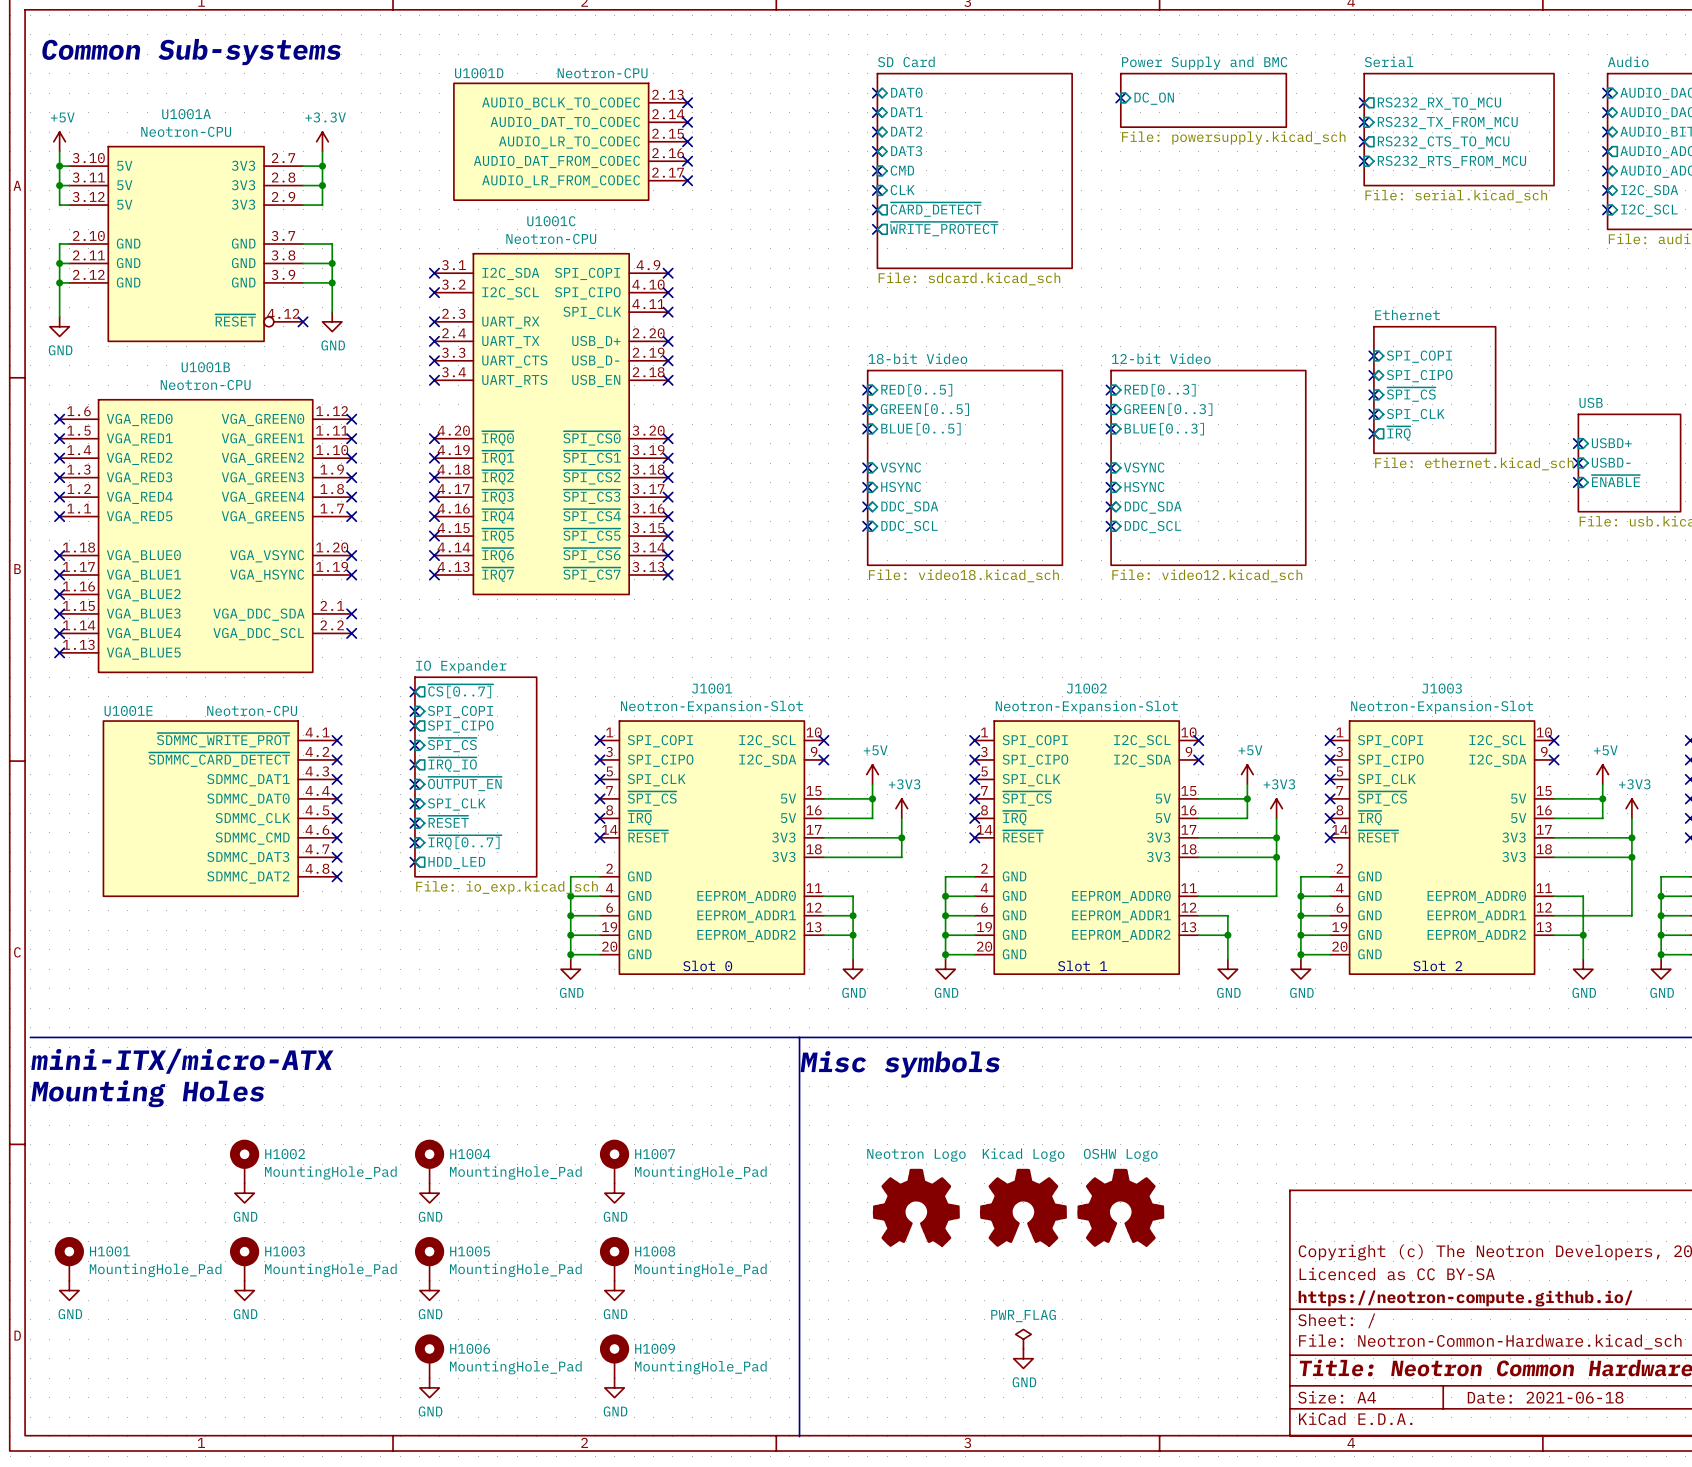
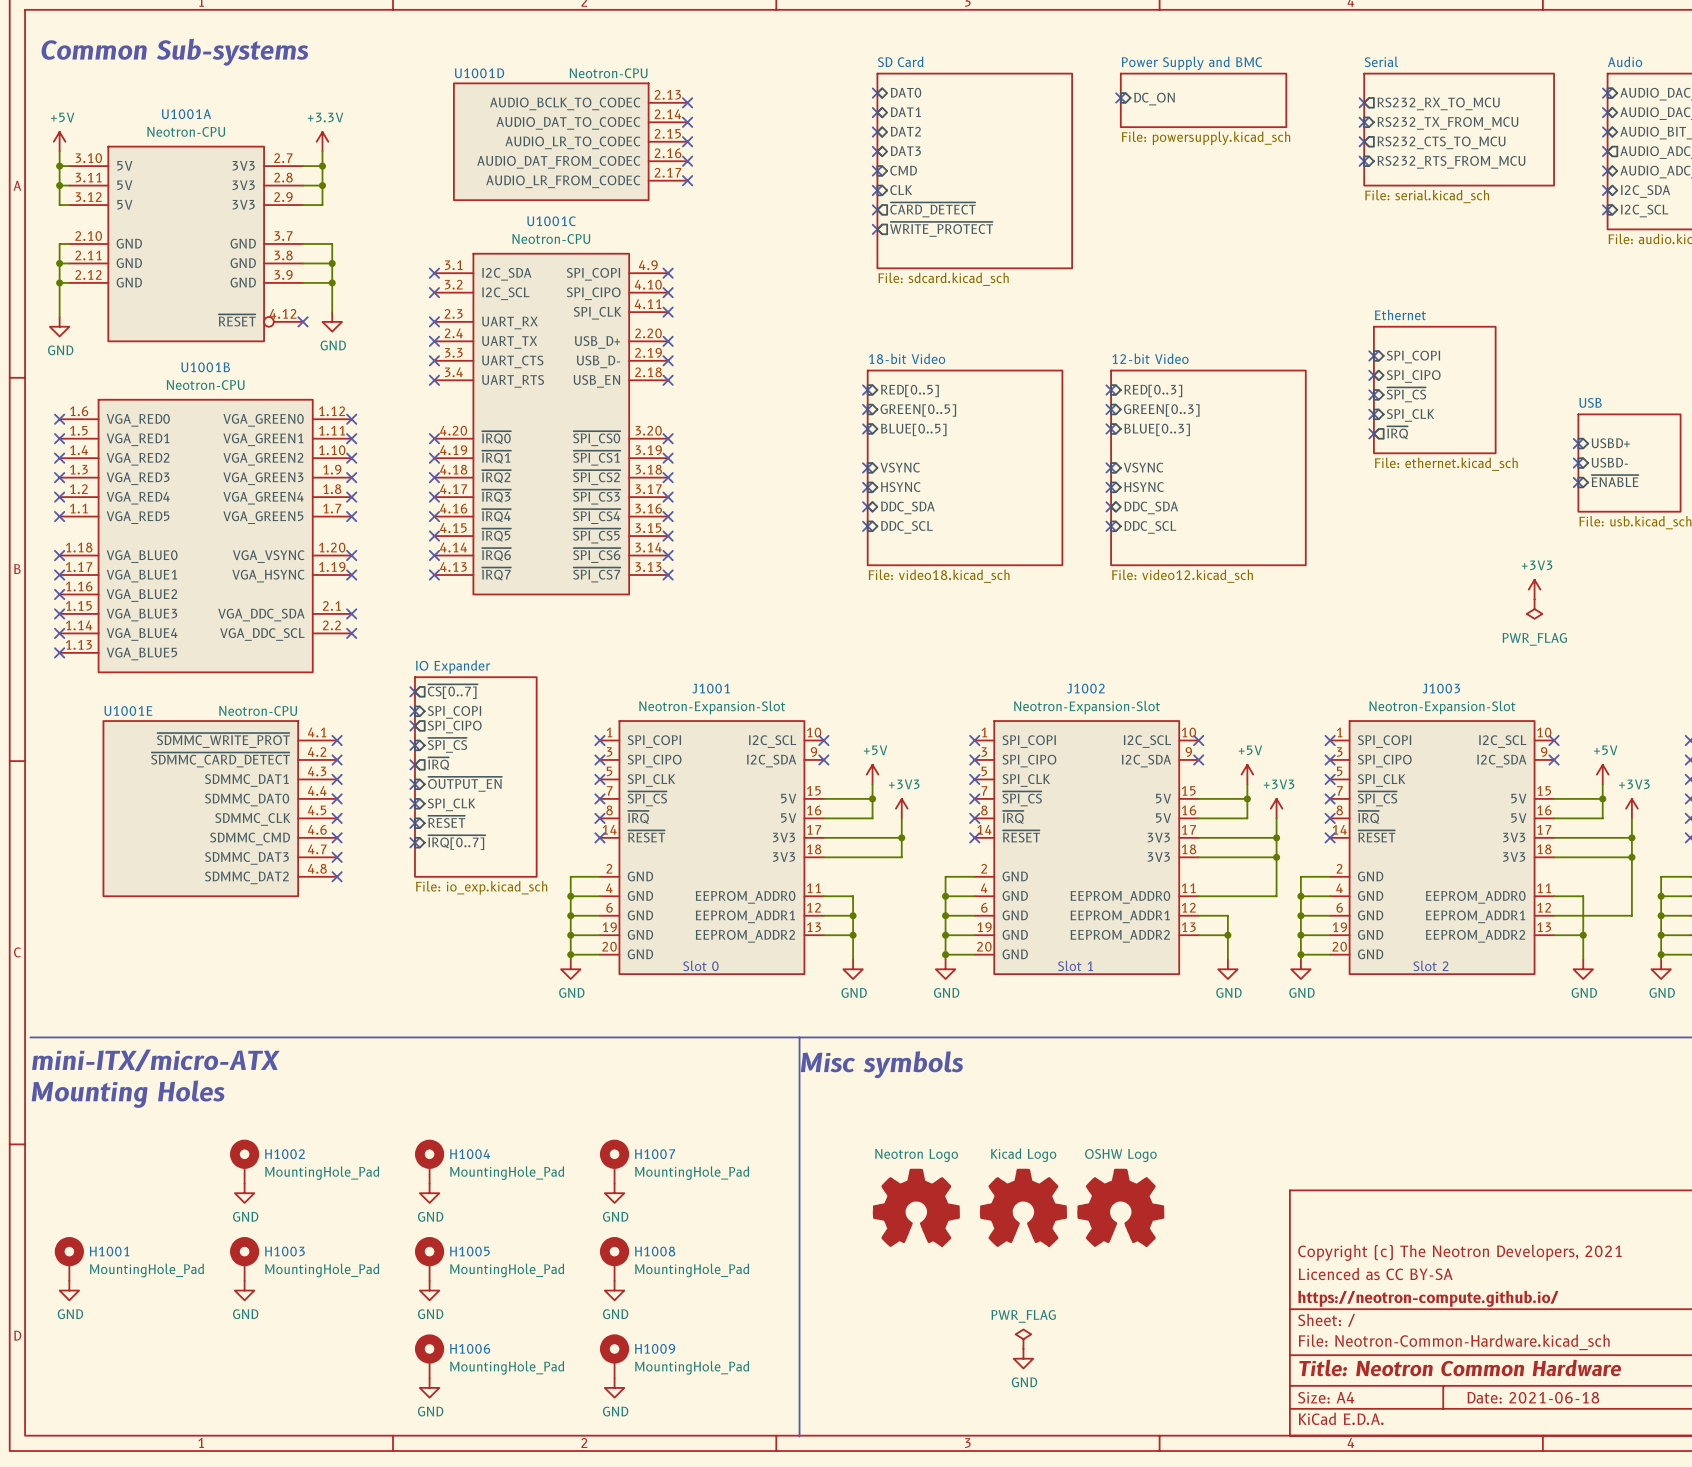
power symbol: none -> +3V3 (1534, 589)
power symbol: none -> PWR_FLAG (1534, 609)
sheet pin: ~{IRQ_IO} (452, 764) -> ~{IRQ} (438, 763)
no-connect mark: (414, 862) -> none
sheet pin: HDD_LED (456, 863) -> none

